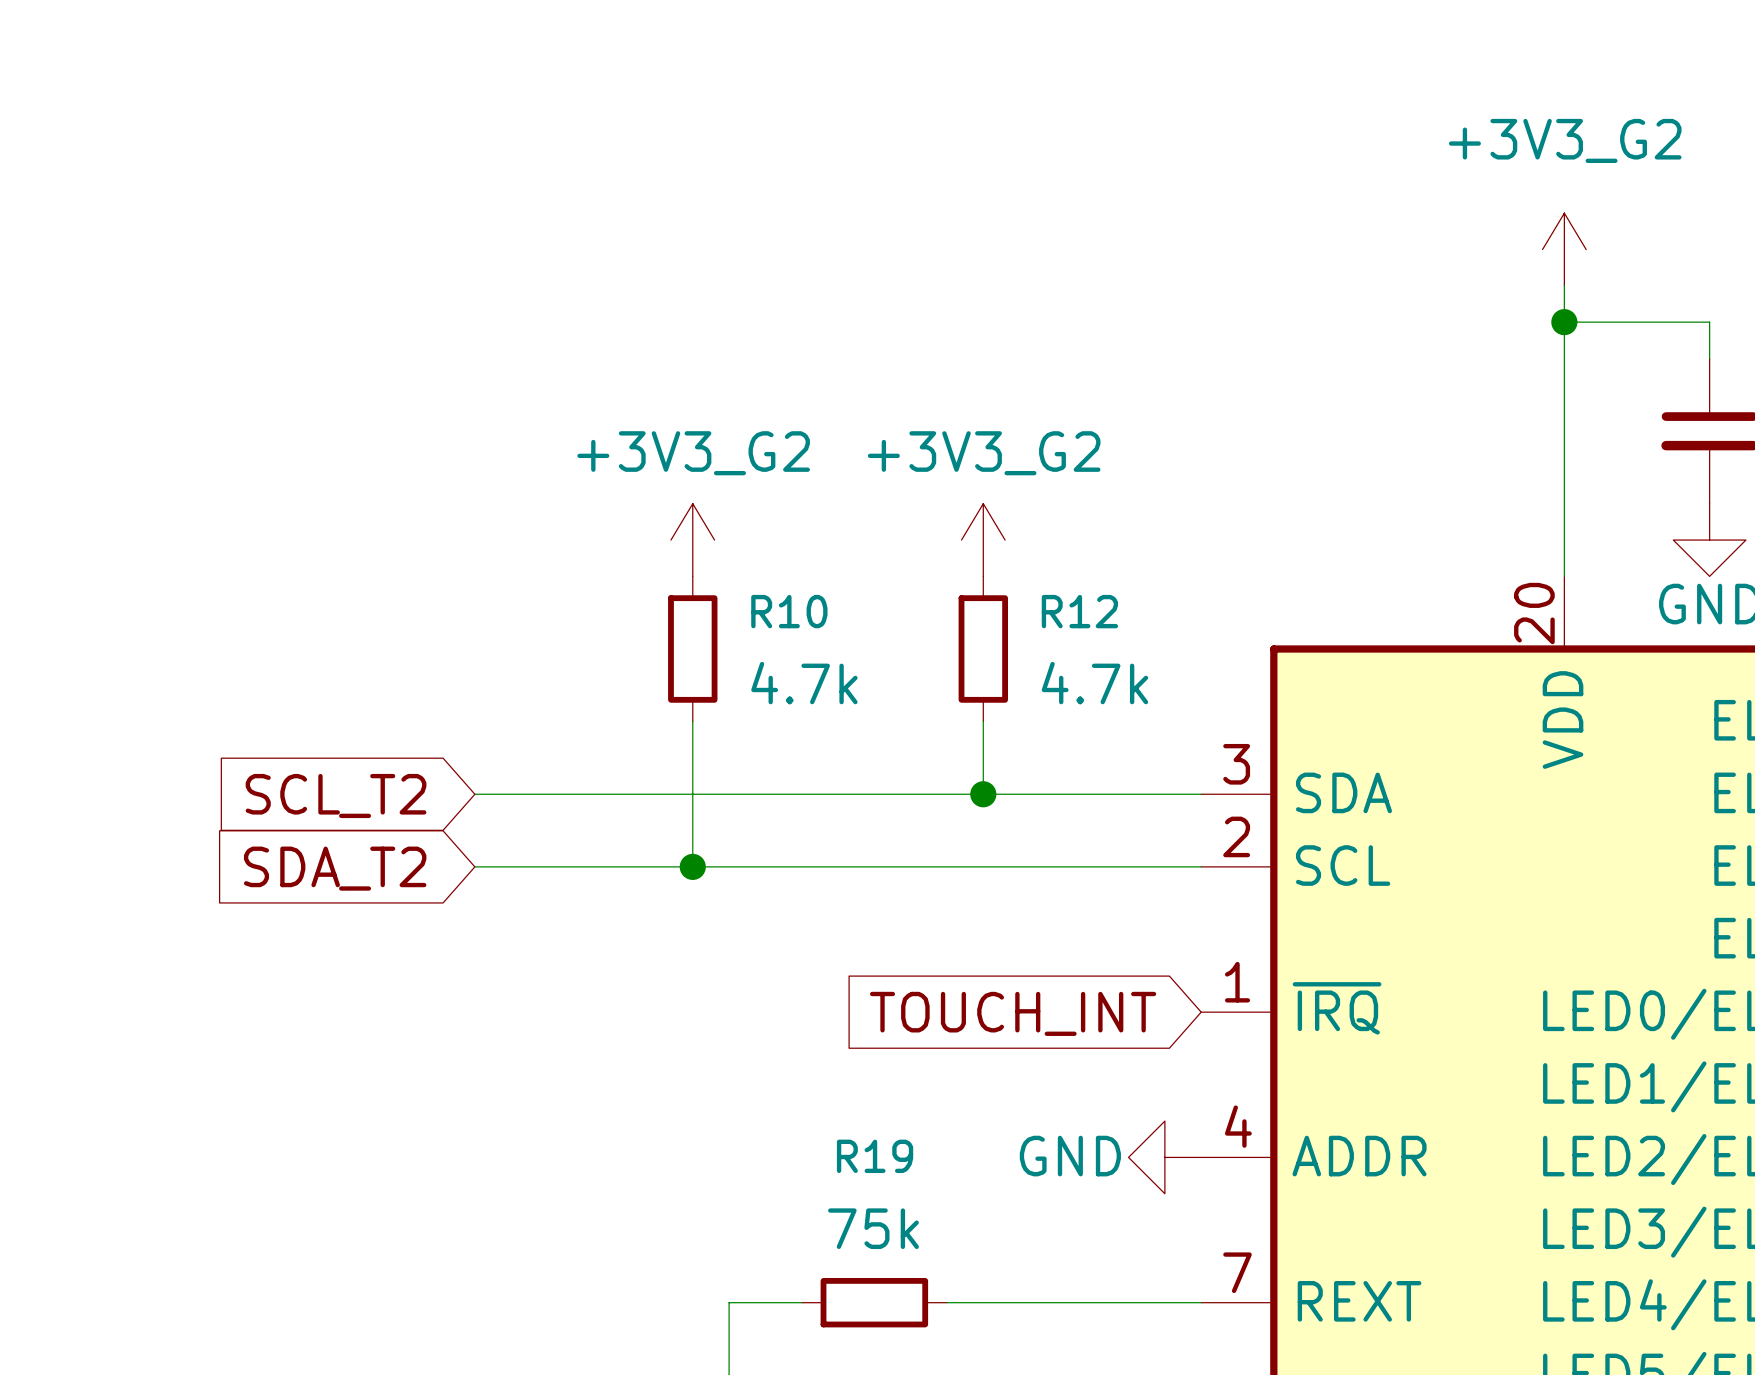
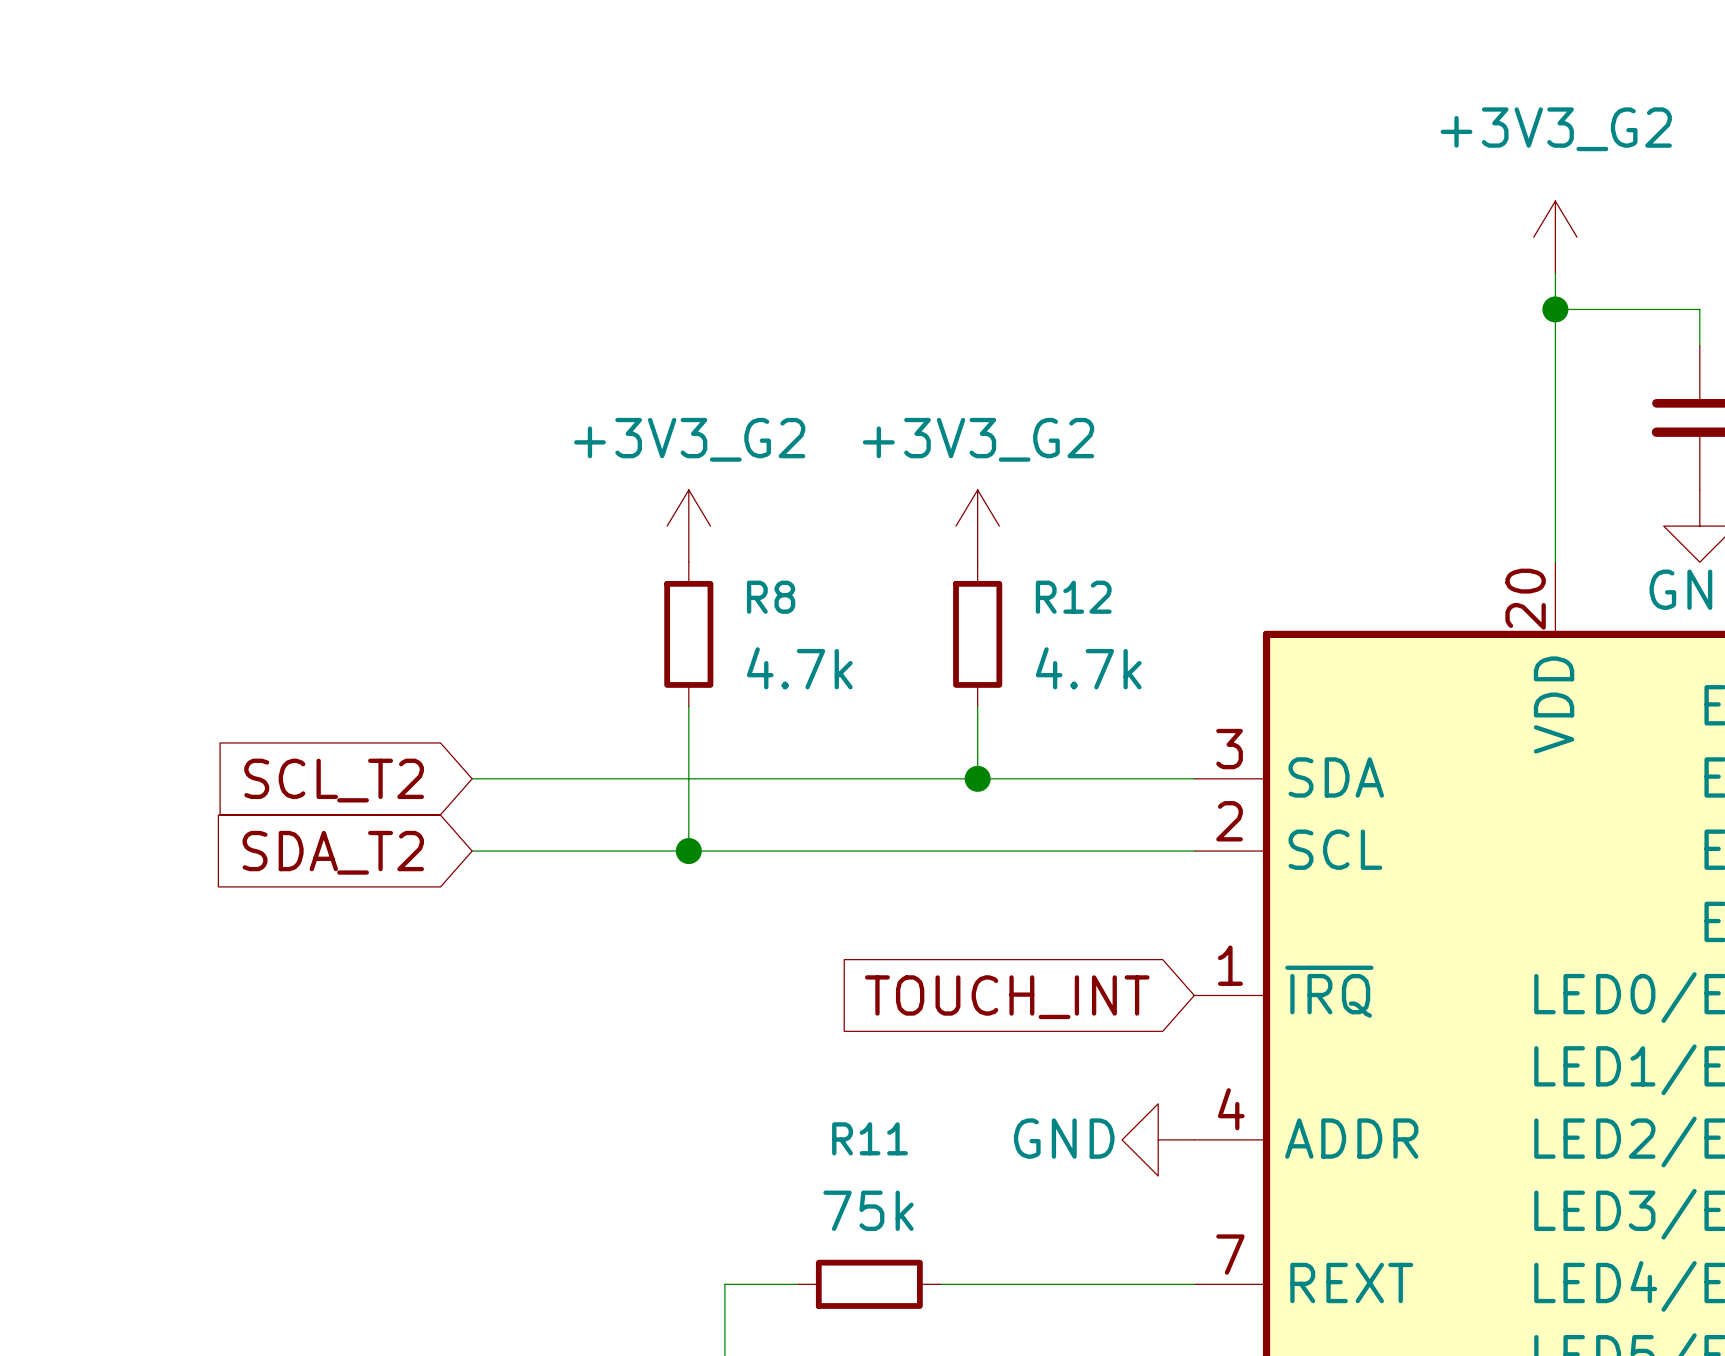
R10 name: R10 (789, 611) -> R8 (771, 597)
R19 name: R19 (875, 1156) -> R11 (870, 1138)

